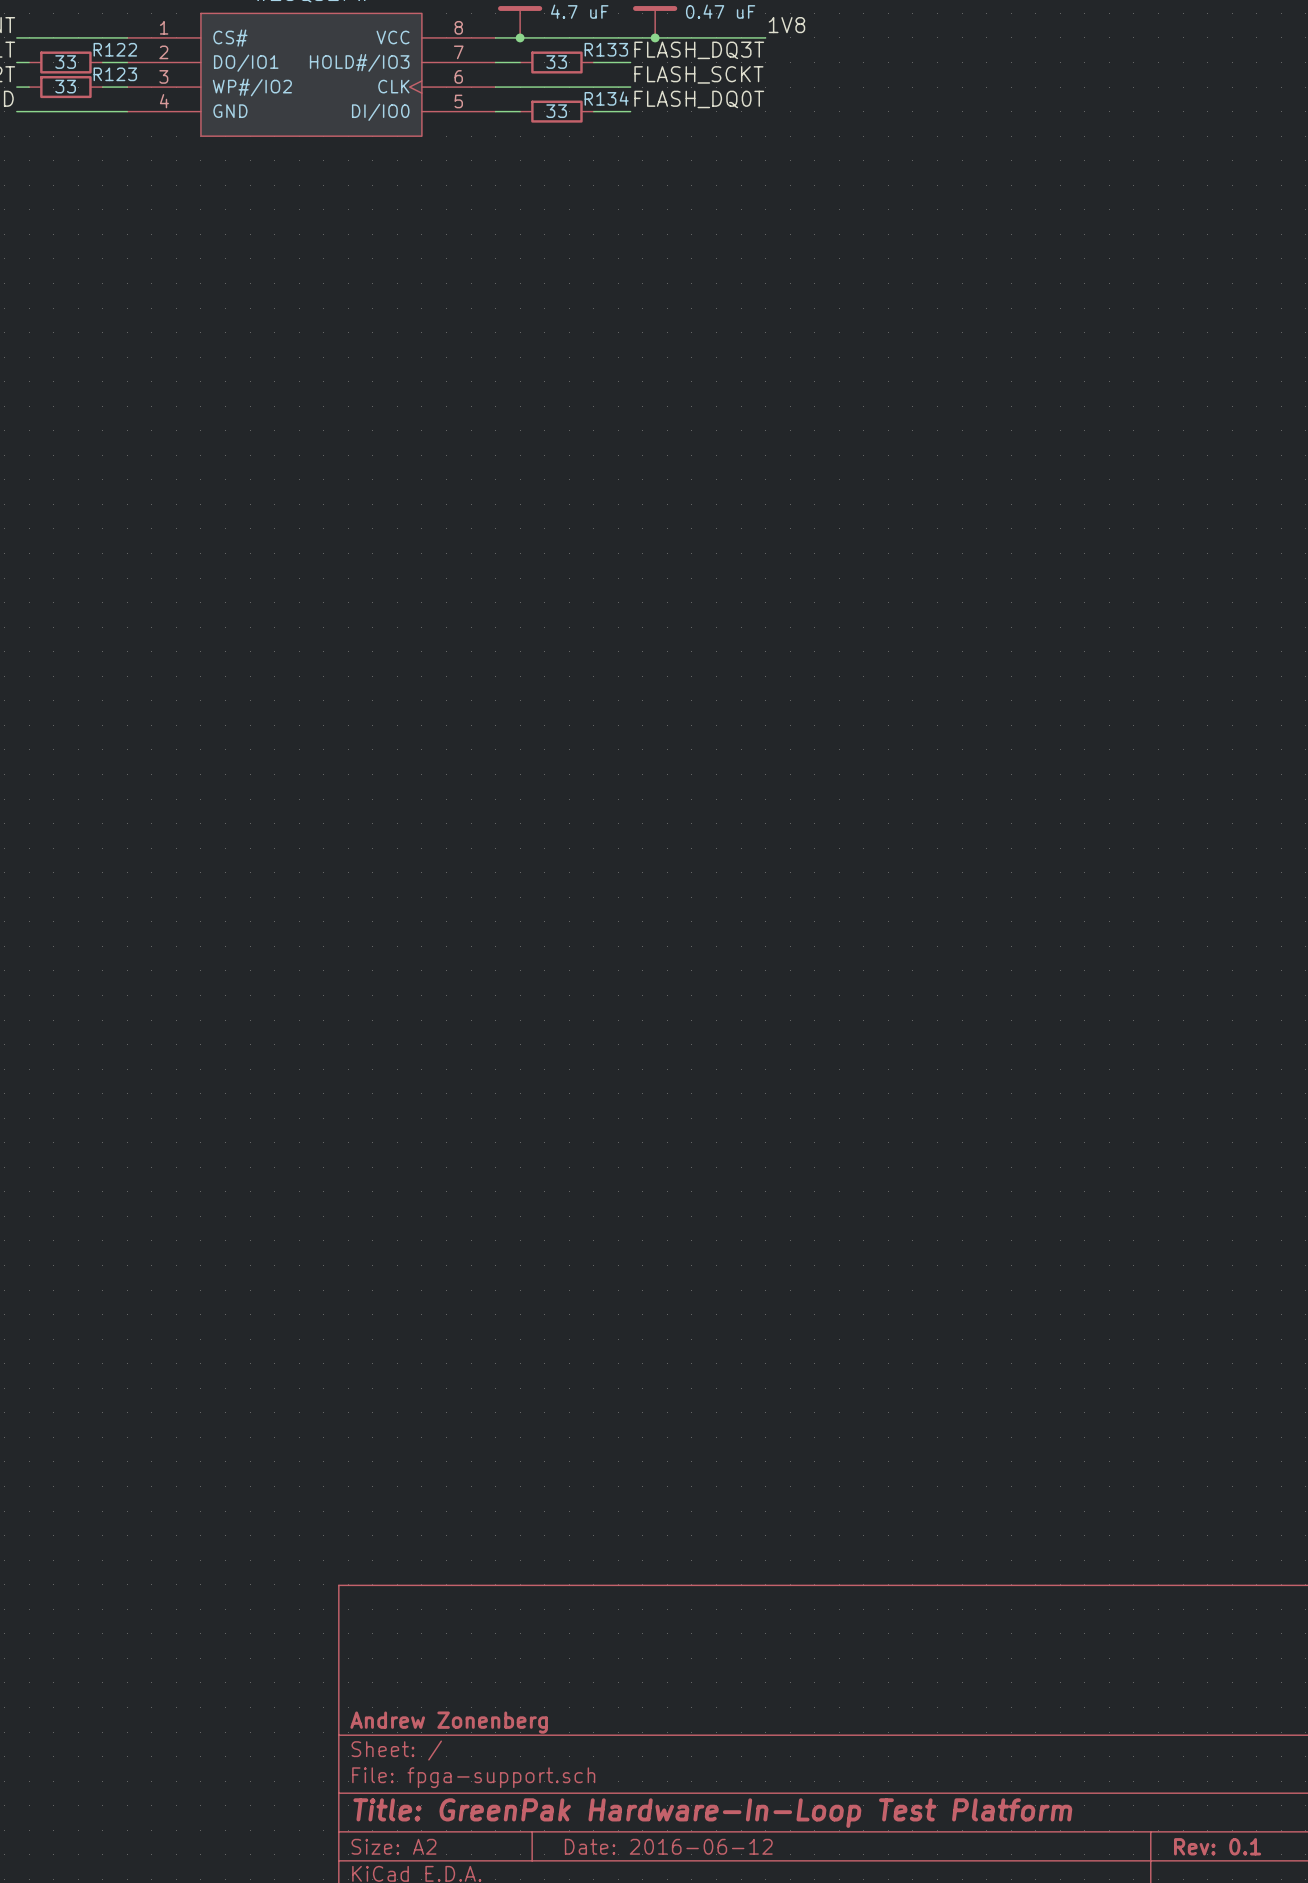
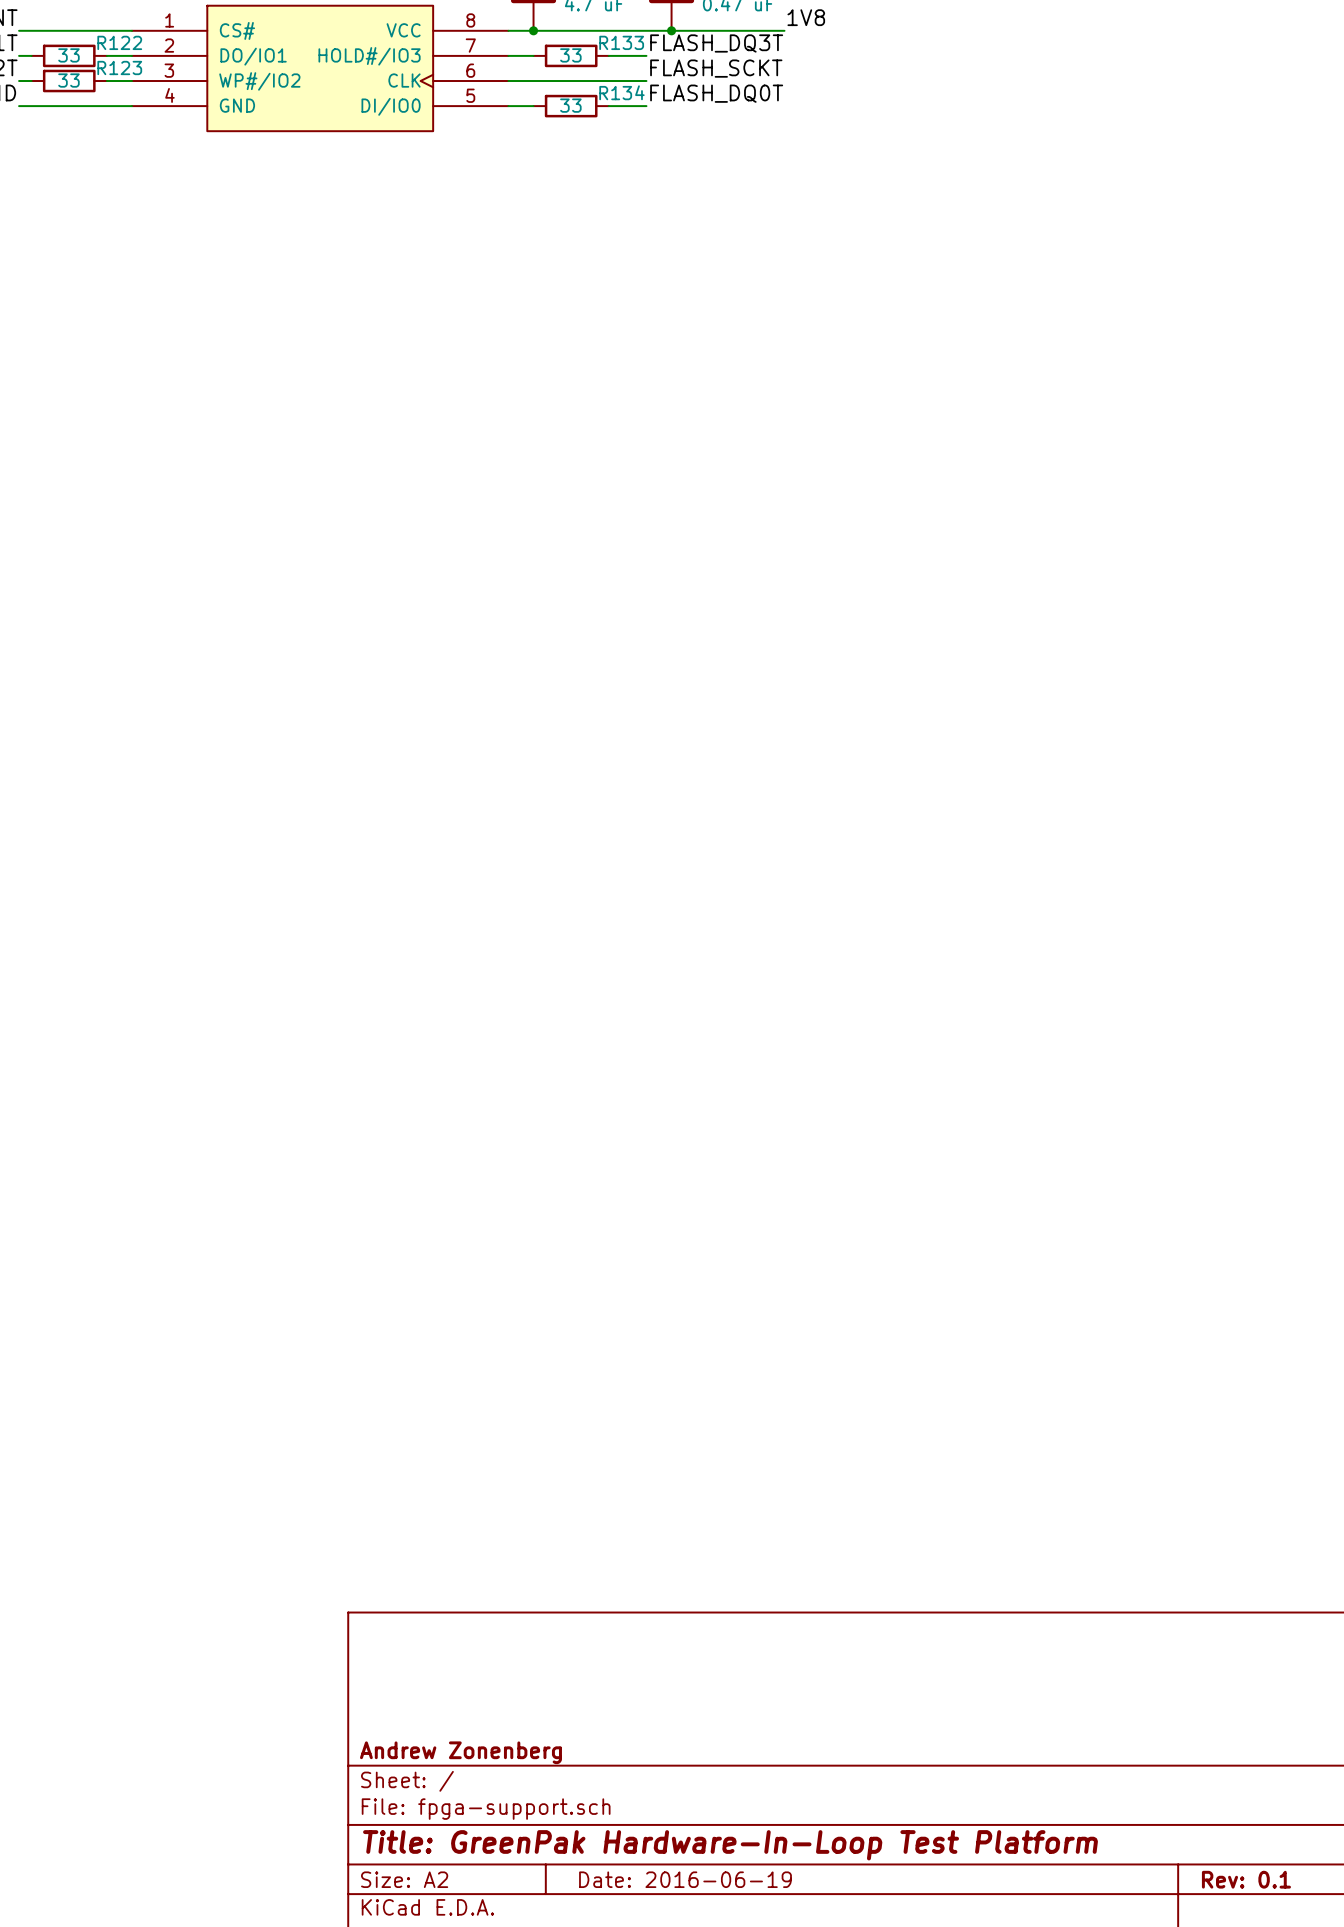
title block: Date: 2016-06-12 (668, 1846) -> Date: 2016-06-19 (685, 1879)

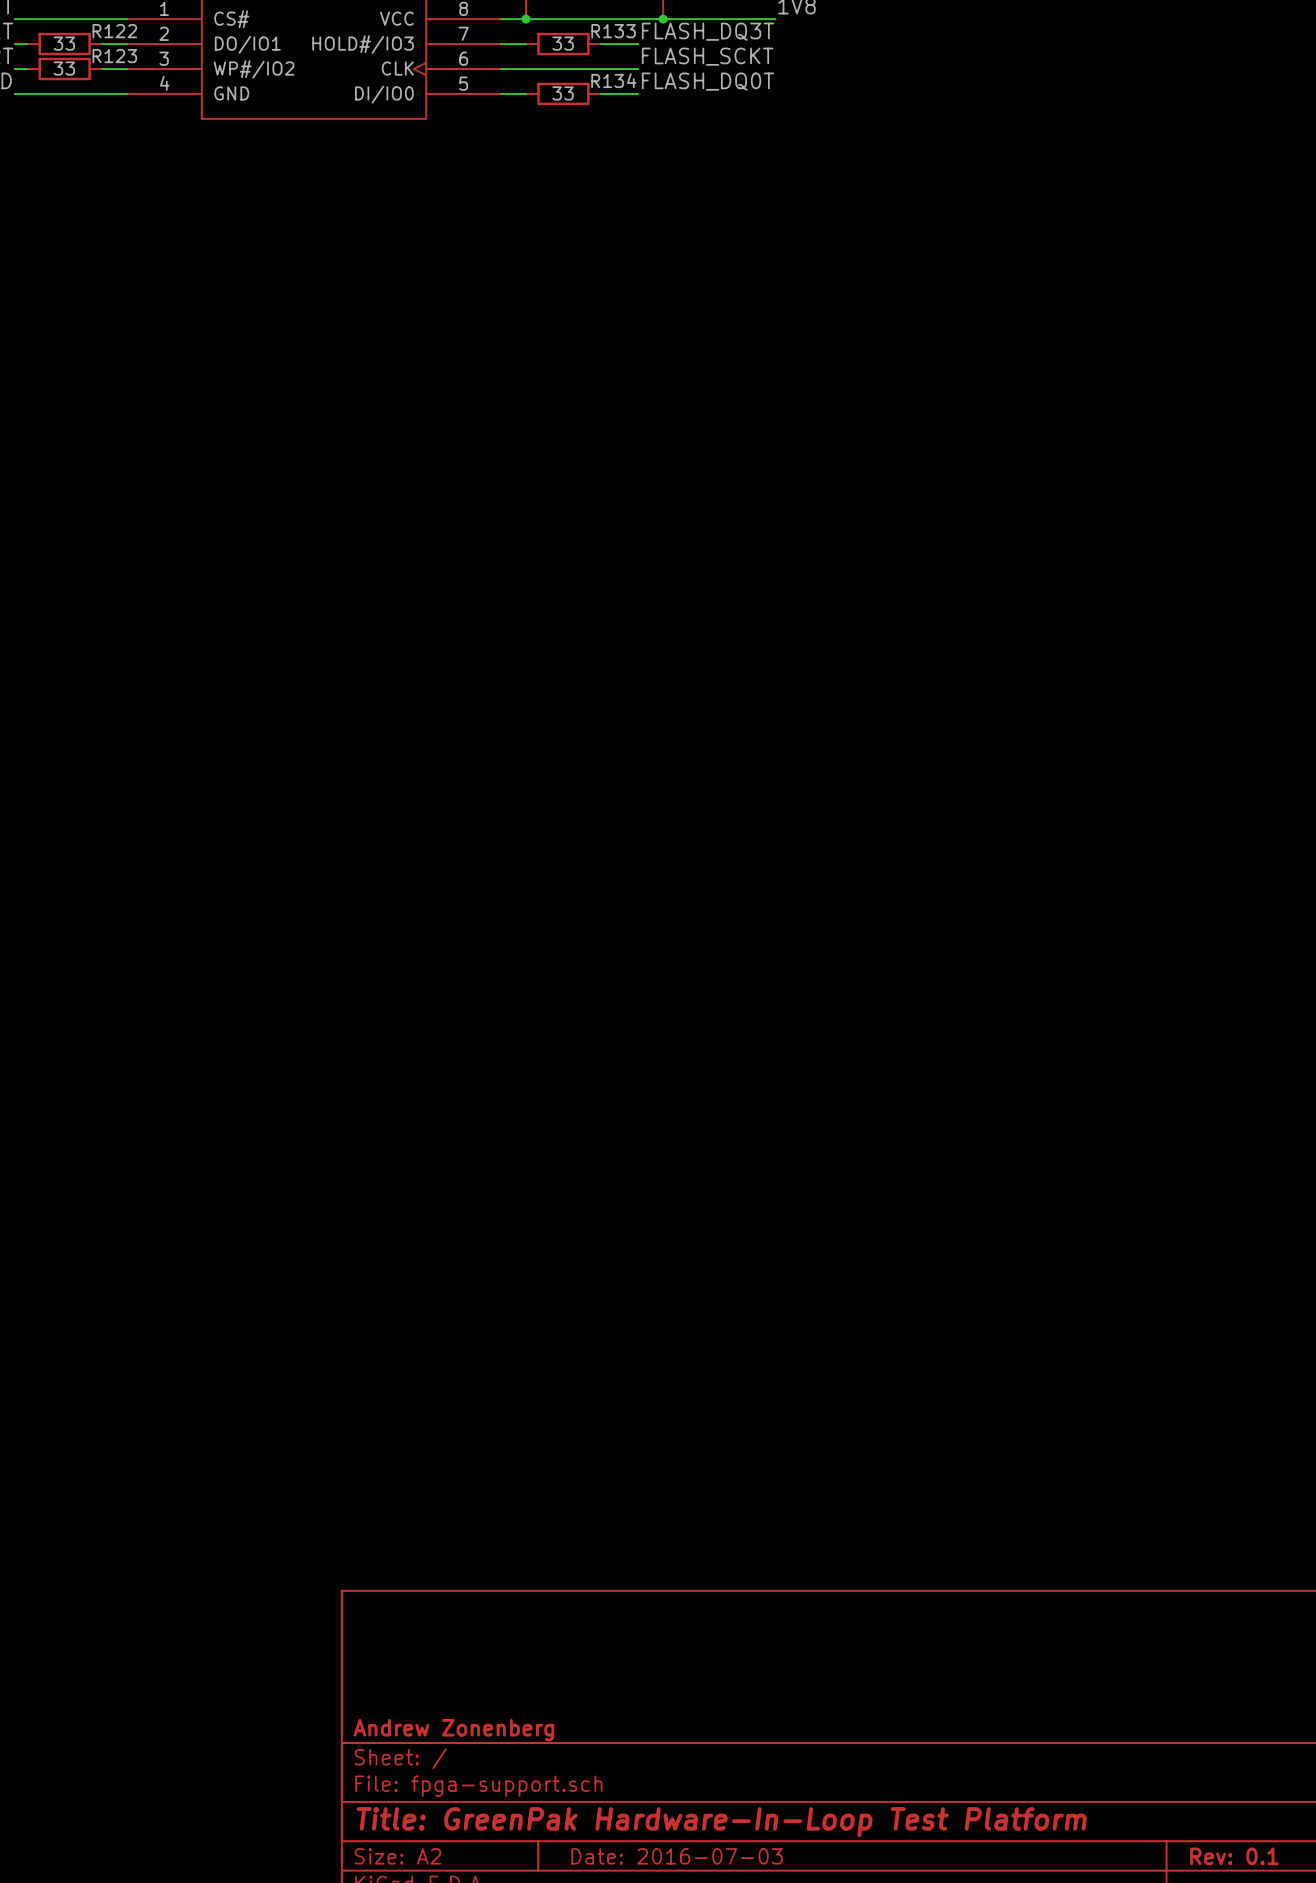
title block: Date: 2016-06-19 (685, 1879) -> Date: 2016-07-03 (677, 1856)

